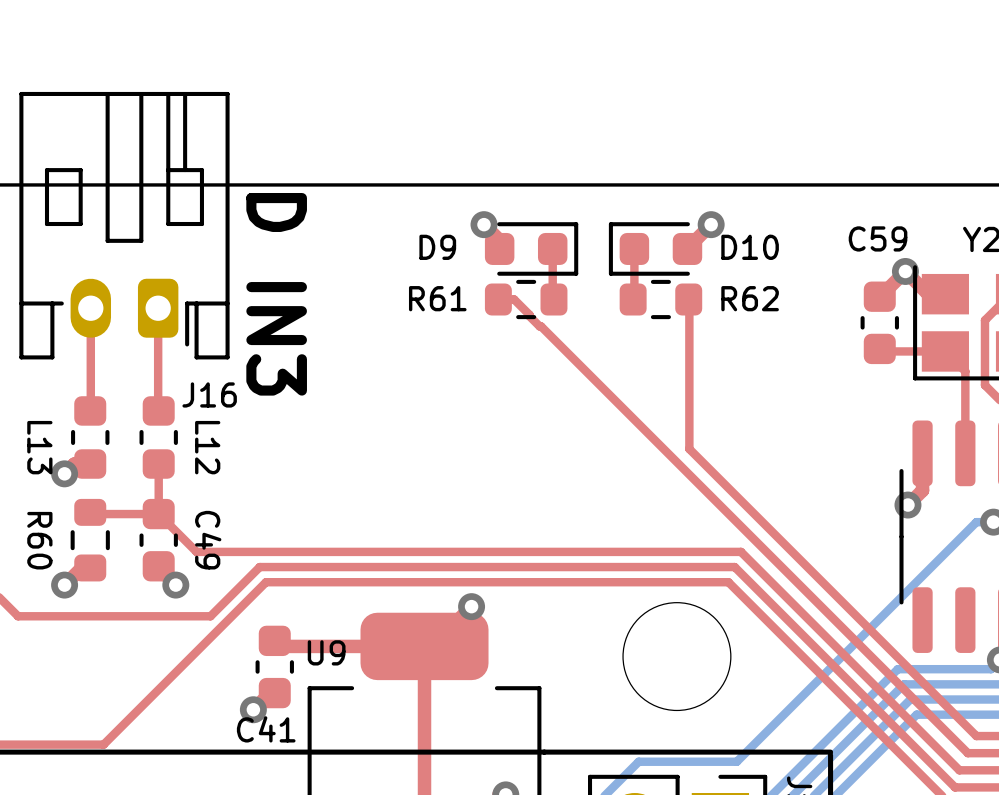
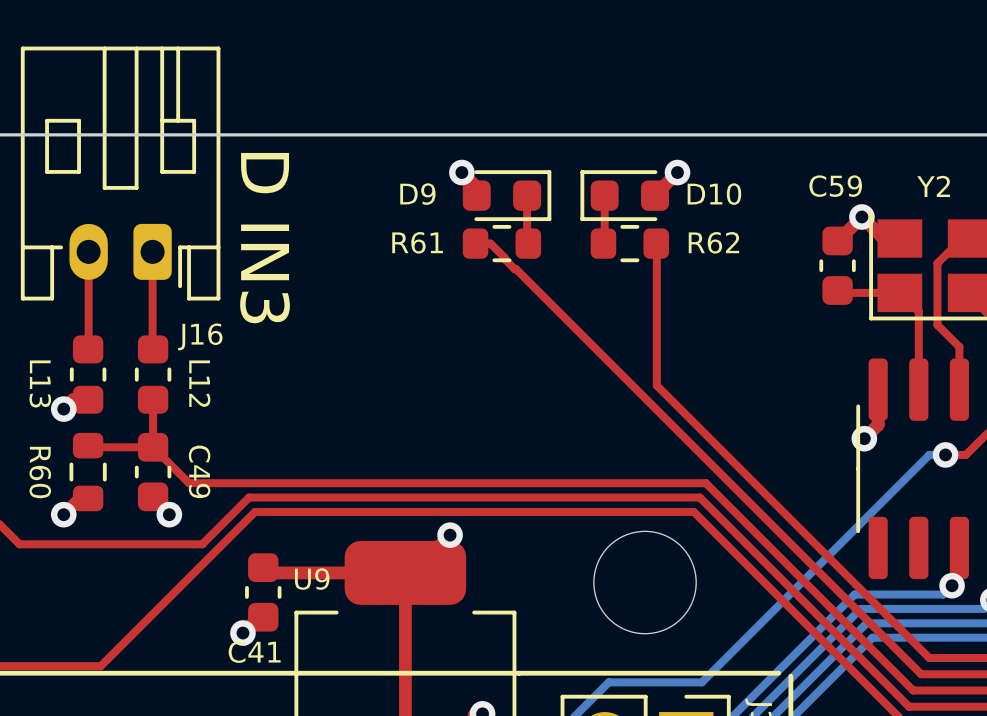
line: (817, 752) (830, 752) -> none

